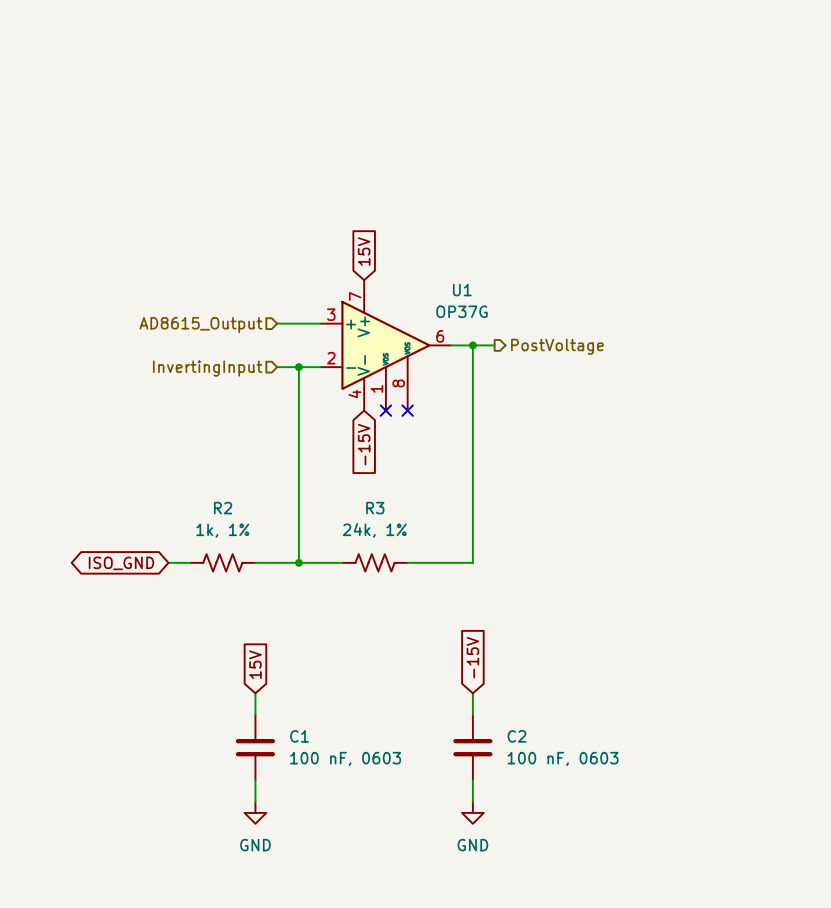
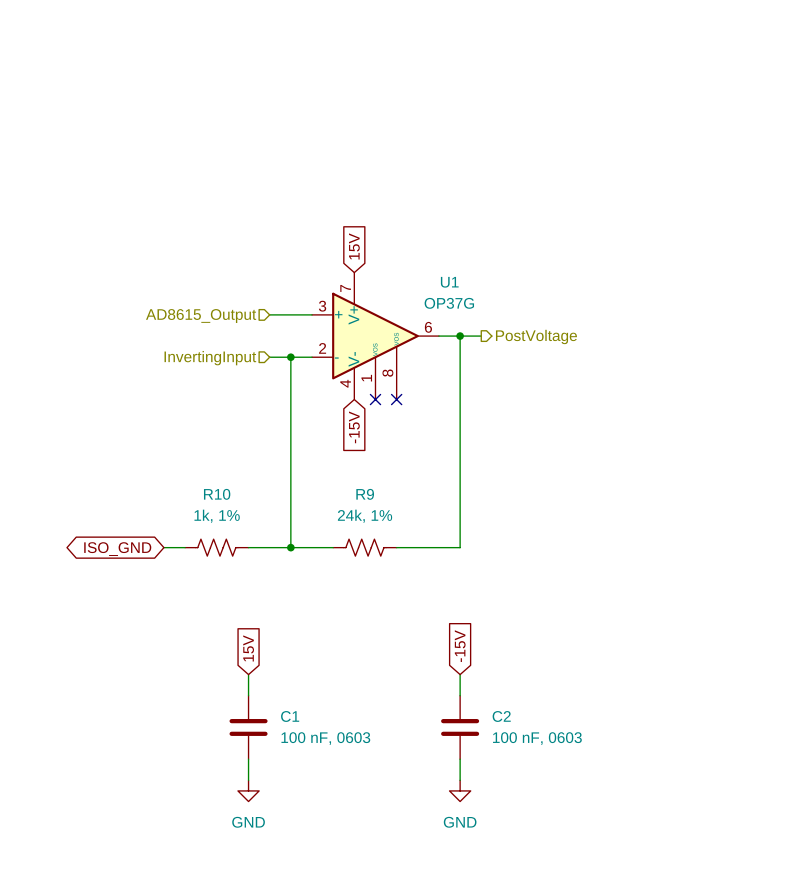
R2 name: R2 (223, 508) -> R10 (217, 494)
R3 name: R3 (375, 508) -> R9 (365, 494)

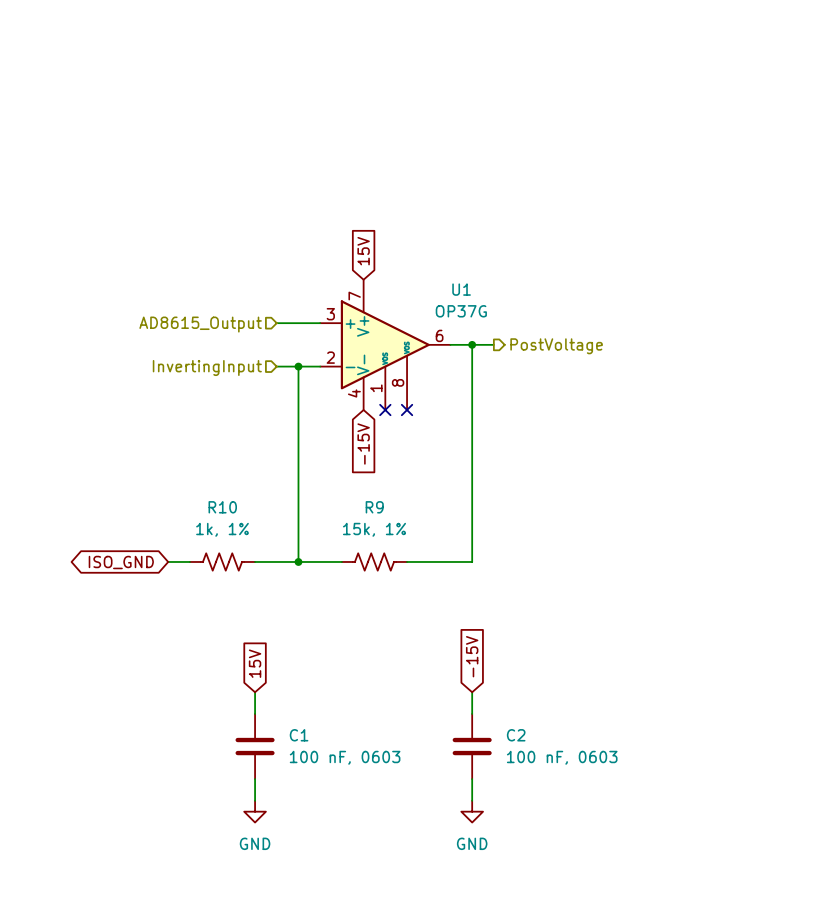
R9 value: 24k, 1% (365, 516) -> 15k, 1% (374, 529)

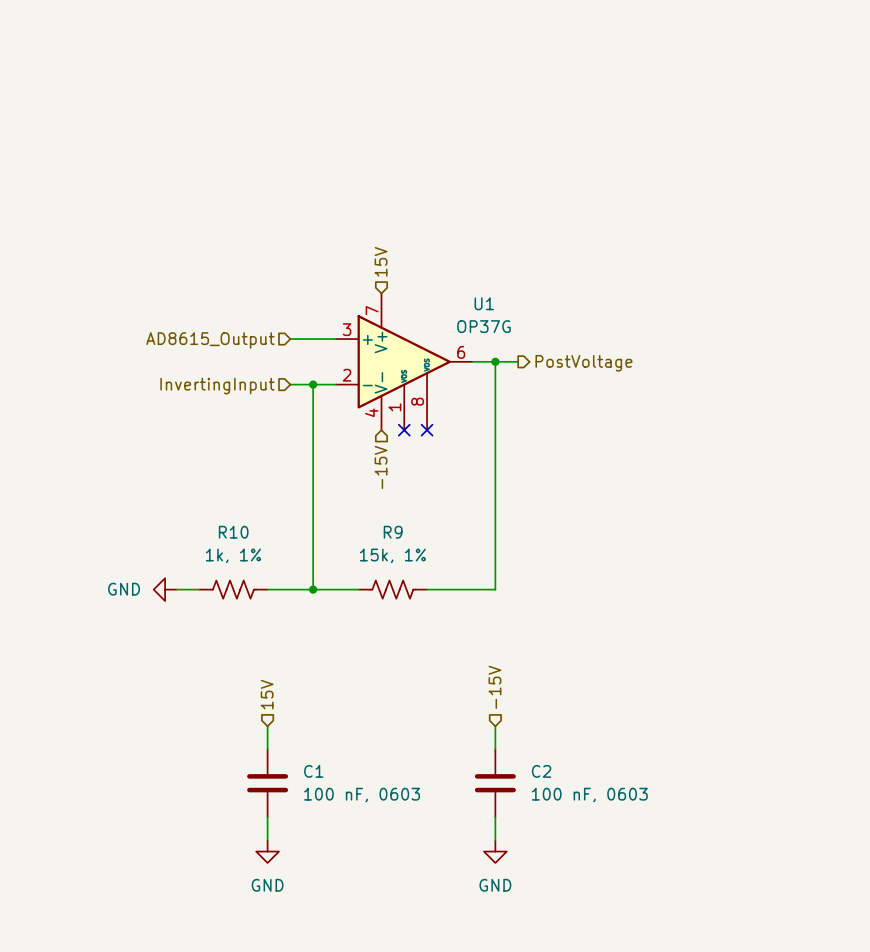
hierarchical label: none -> 15V (381, 261)
global label: 15V (363, 251) -> none
global label: -15V (363, 444) -> none
hierarchical label: none -> -15V (381, 467)
power symbol: none -> GND (165, 589)
global label: ISO_GND (121, 562) -> none
hierarchical label: none -> -15V (494, 687)
global label: -15V (472, 656) -> none
hierarchical label: none -> 15V (267, 694)
global label: 15V (255, 663) -> none

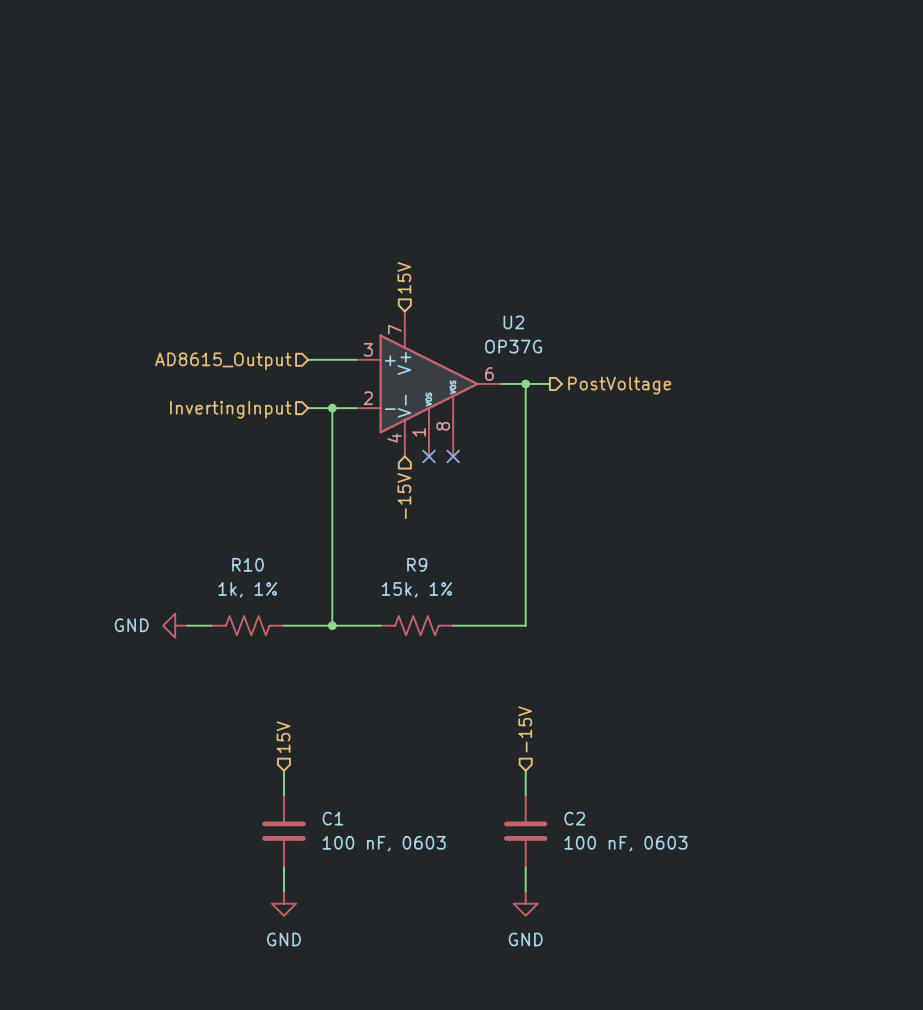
U1 name: U1 (484, 303) -> U2 (513, 322)

